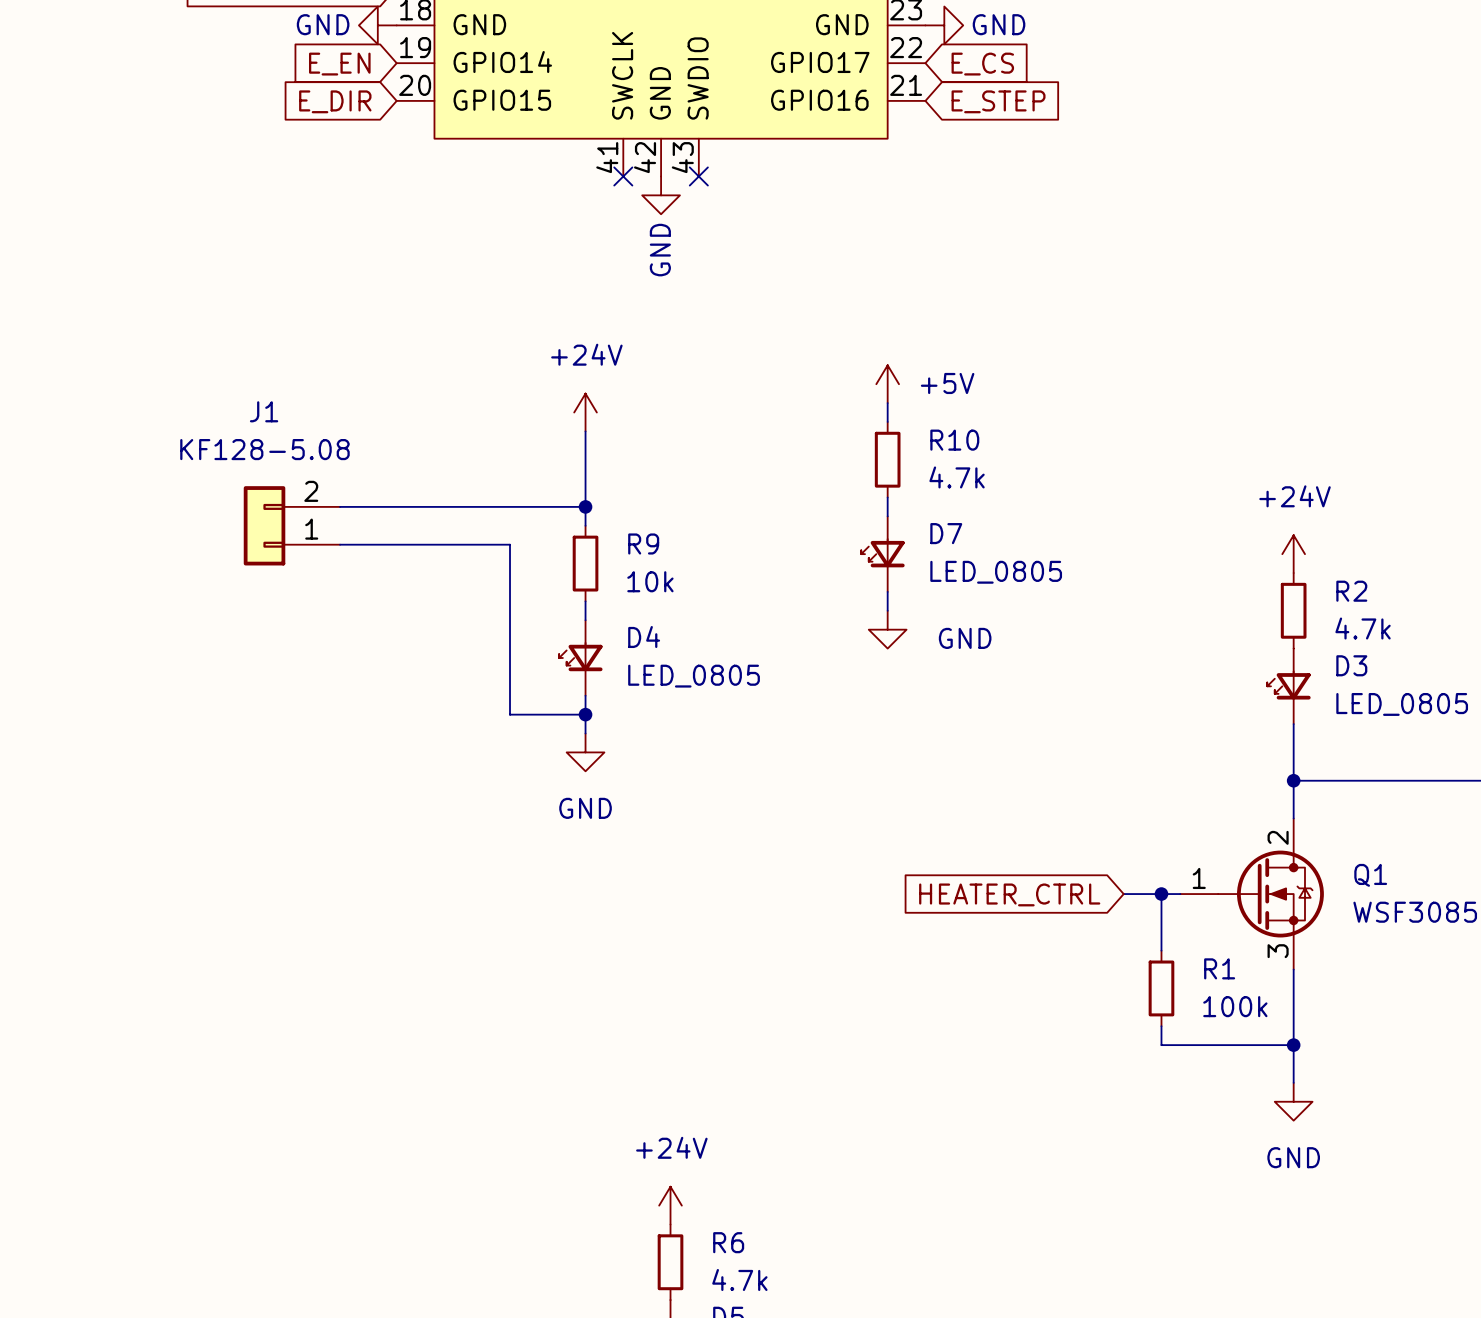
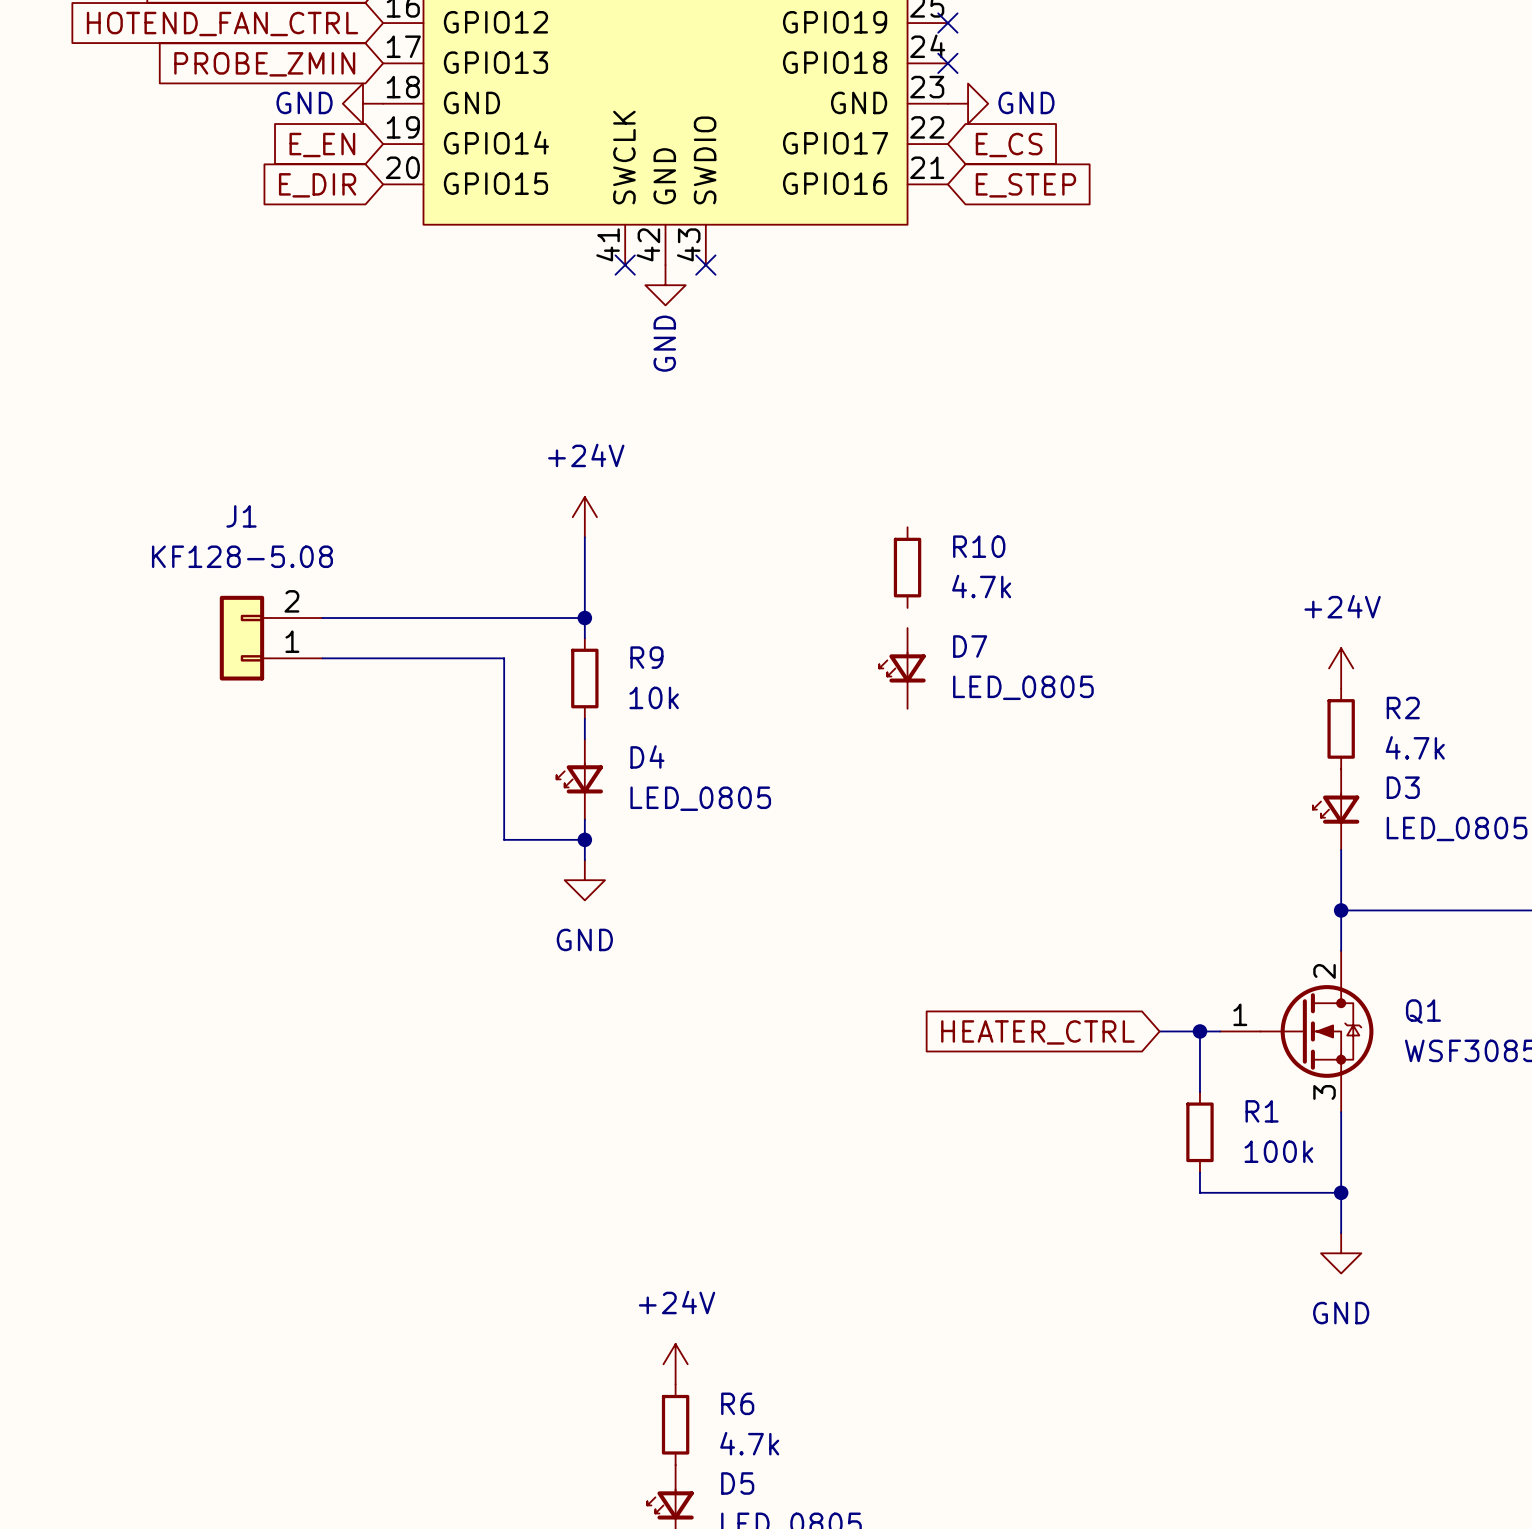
power symbol: +5V (887, 384) -> none
wire: (887, 403) (887, 421) -> none
wire: (887, 497) (887, 516) -> none
wire: (887, 591) (887, 610) -> none
power symbol: GND (887, 629) -> none

